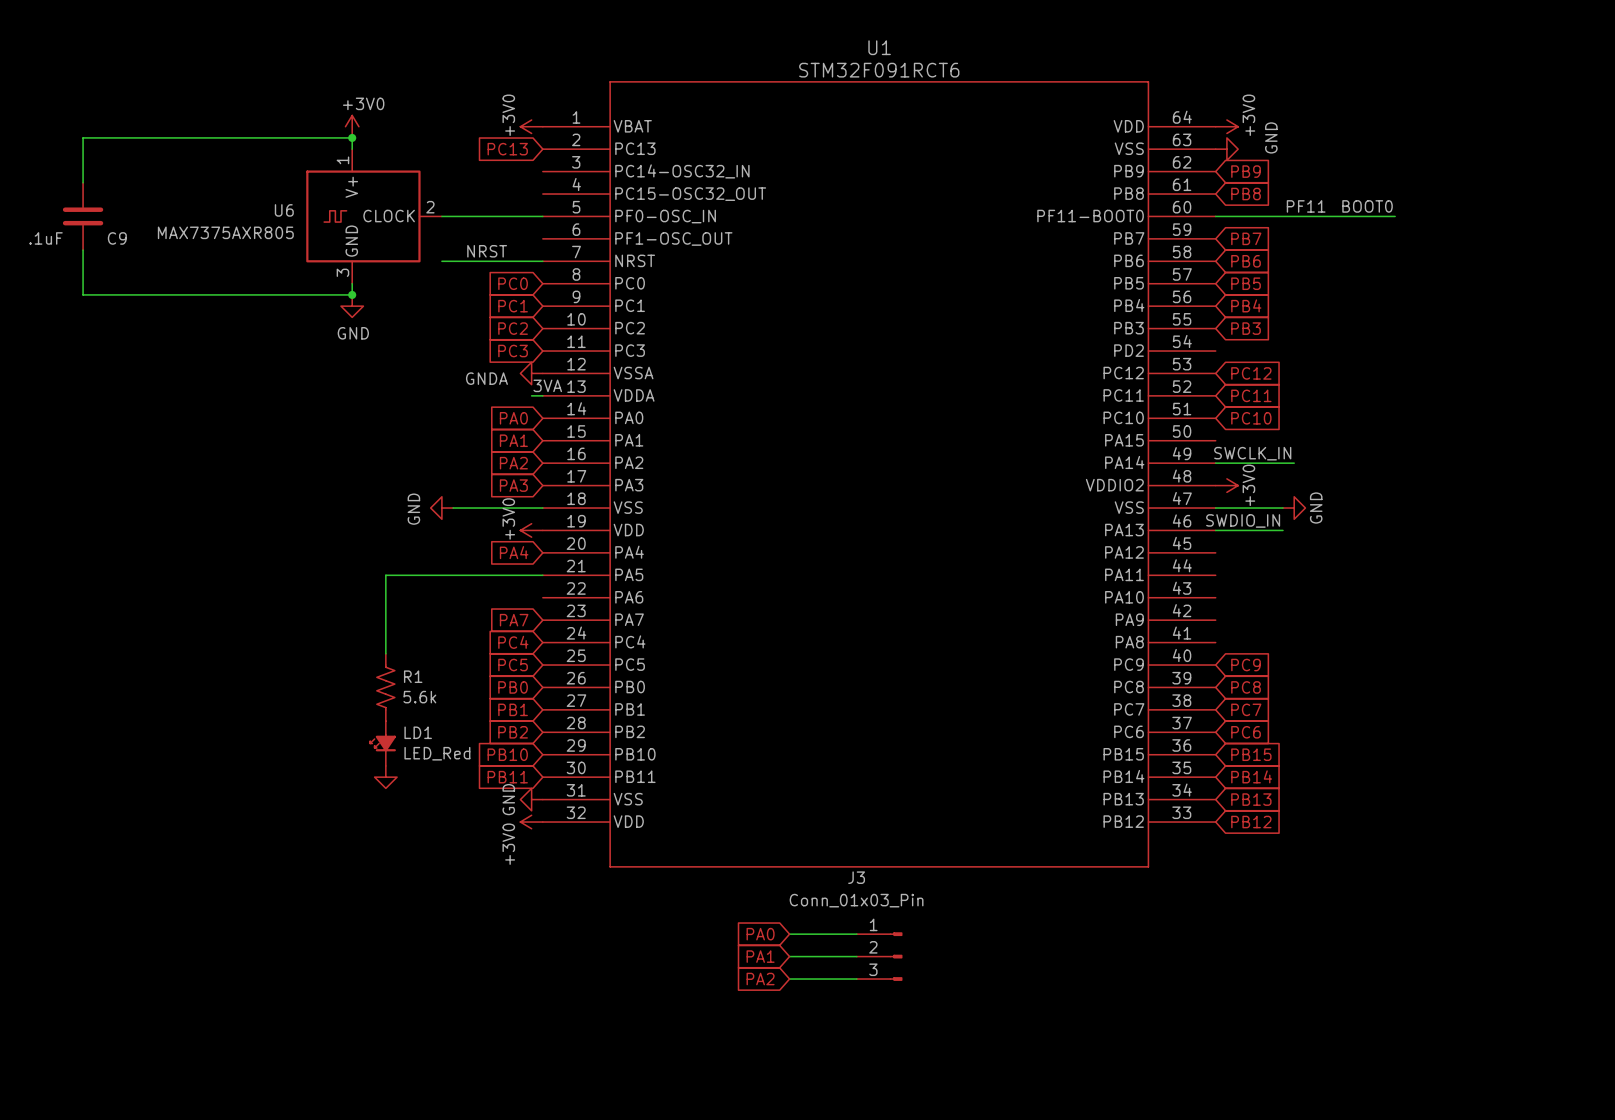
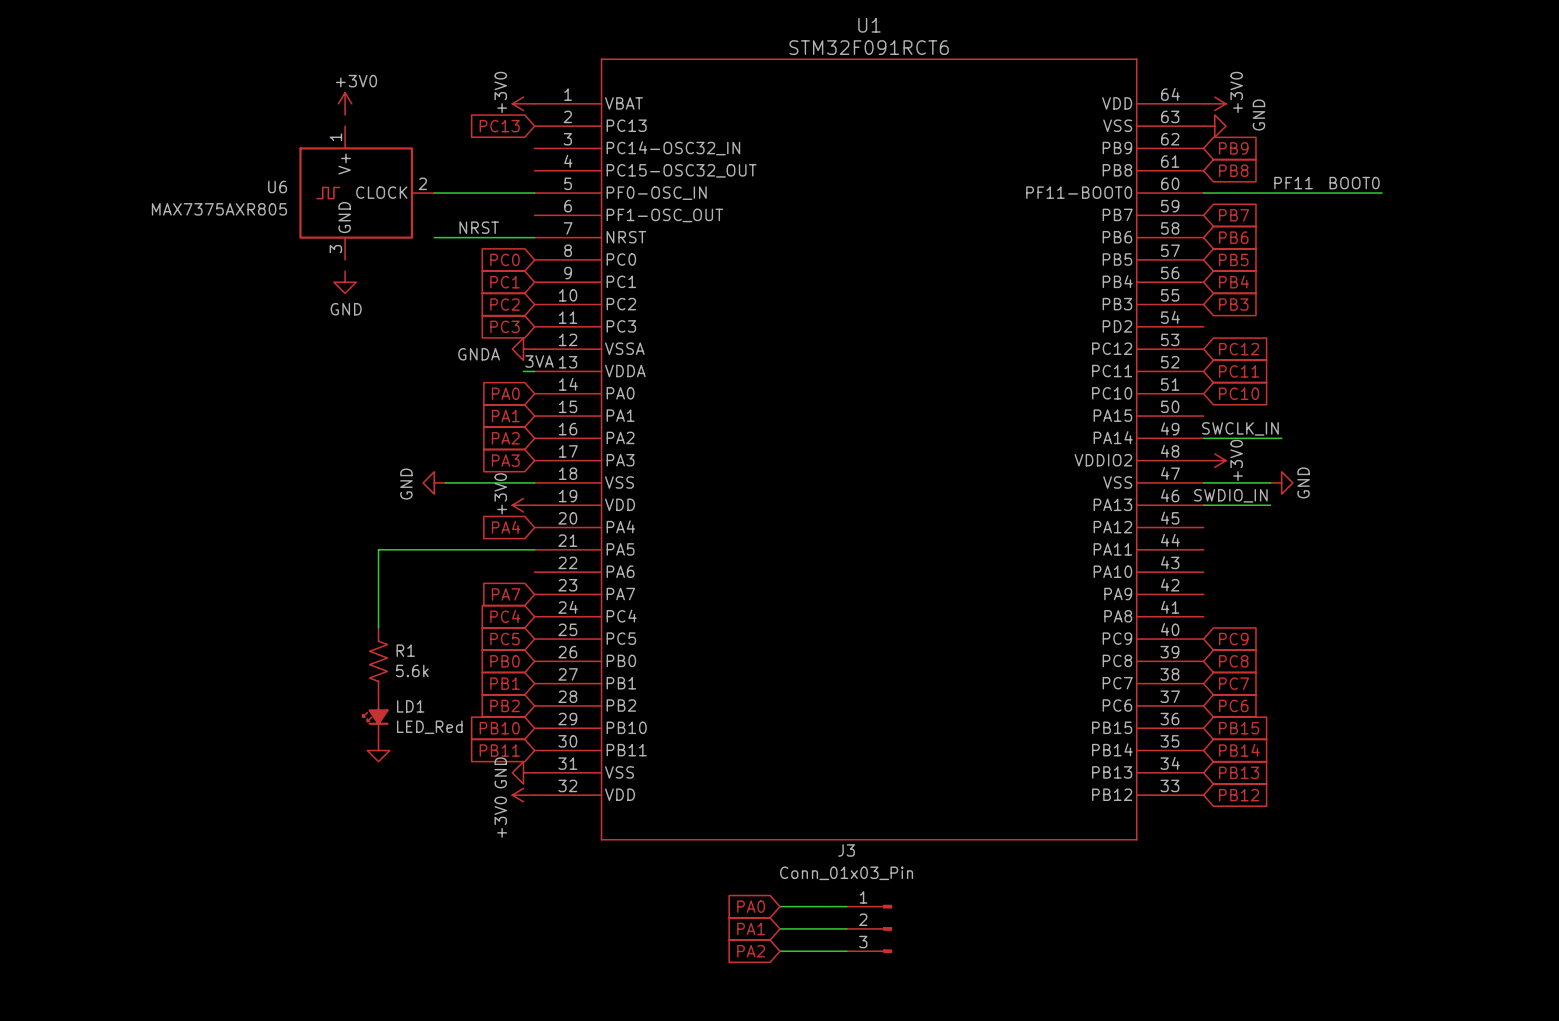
junction: (352, 137) -> none
wire: (352, 149) (352, 137) (83, 137) (83, 182) -> none
C9: .1uF (83, 216) -> none
wire: (83, 250) (83, 294) (352, 294) (352, 283) -> none
junction: (352, 294) -> none

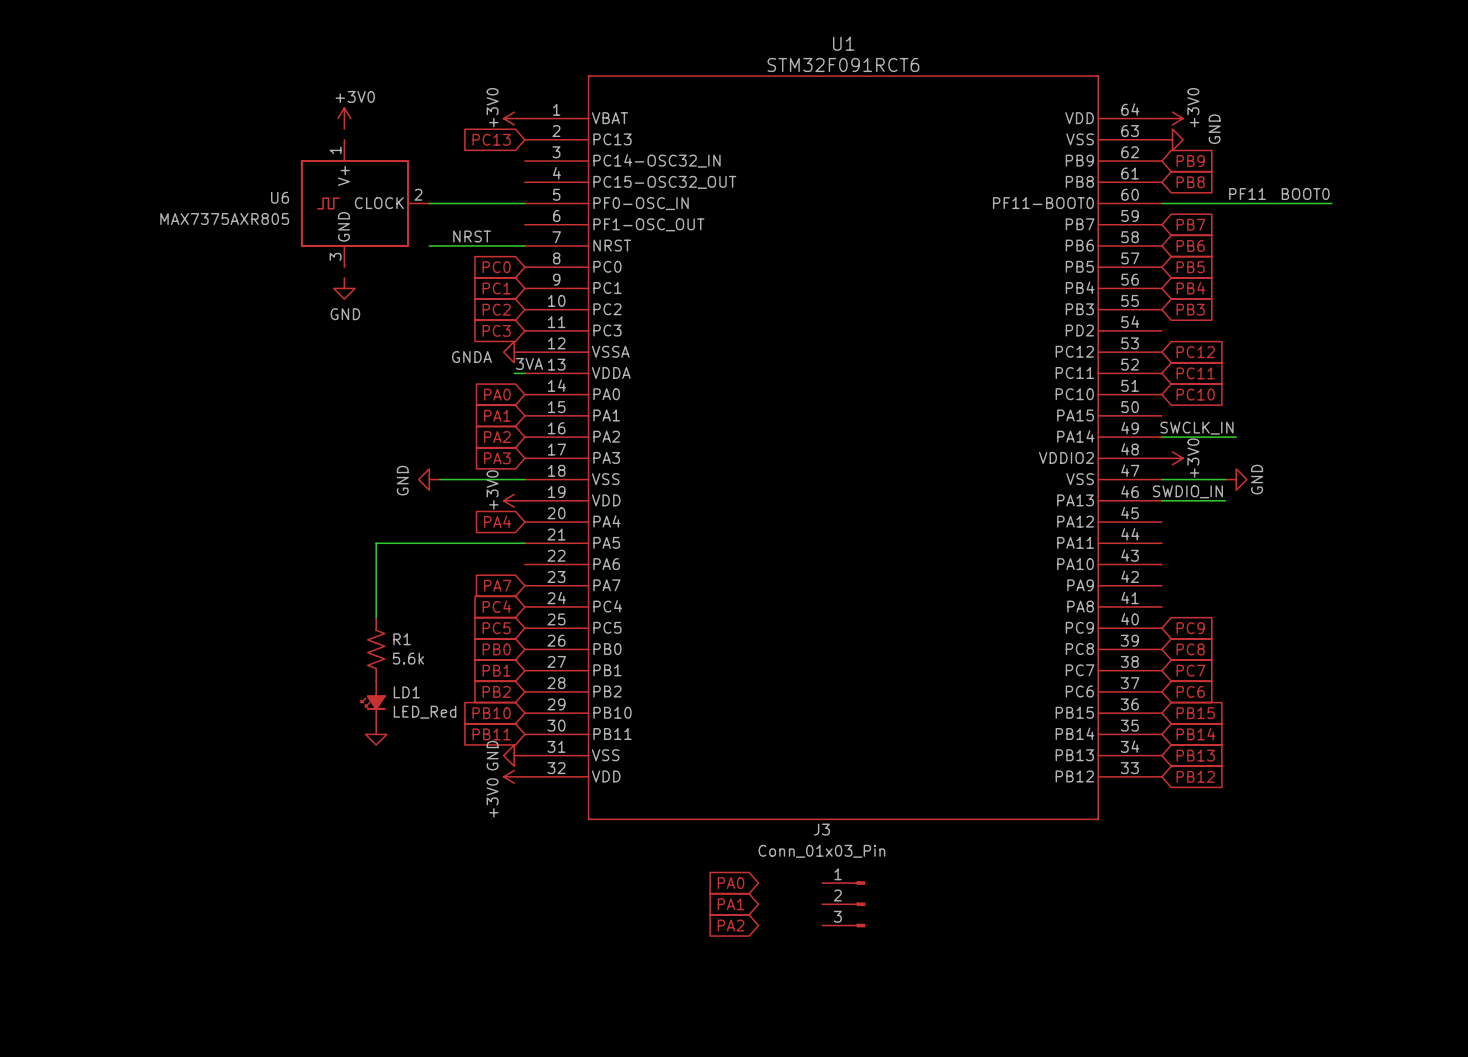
wire: (779, 906) (846, 906) -> none
wire: (779, 928) (846, 928) -> none
wire: (779, 951) (846, 951) -> none

